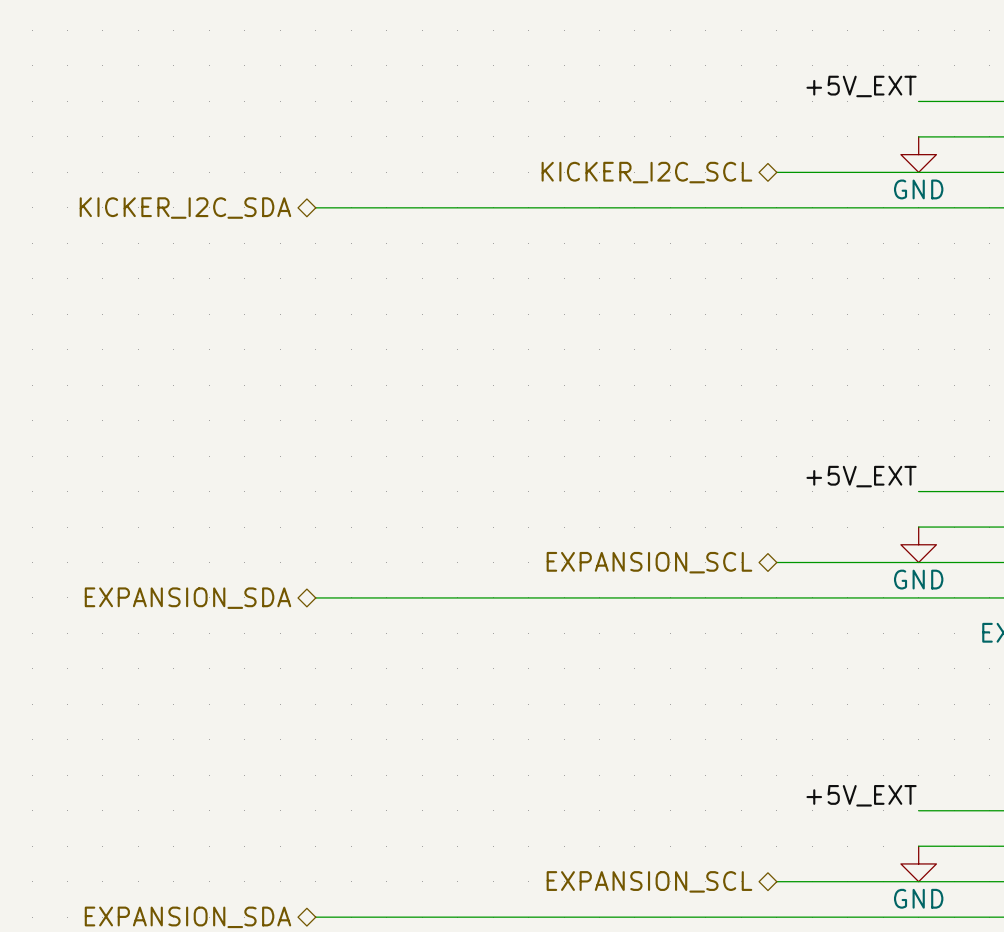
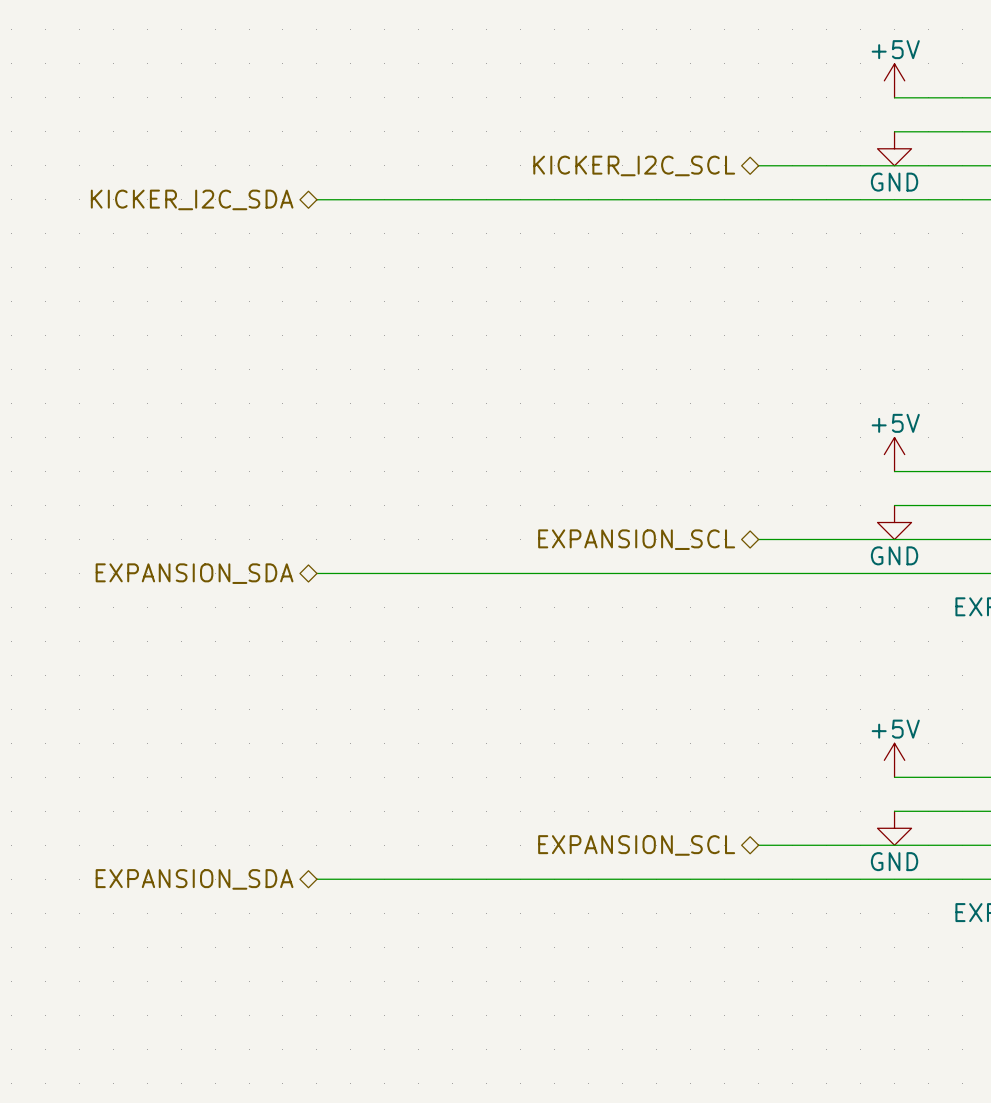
power symbol: none -> +5V (894, 80)
label: +5V_EXT (861, 86) -> none
power symbol: none -> +5V (894, 454)
label: +5V_EXT (861, 476) -> none
power symbol: none -> +5V (894, 760)
label: +5V_EXT (861, 795) -> none

